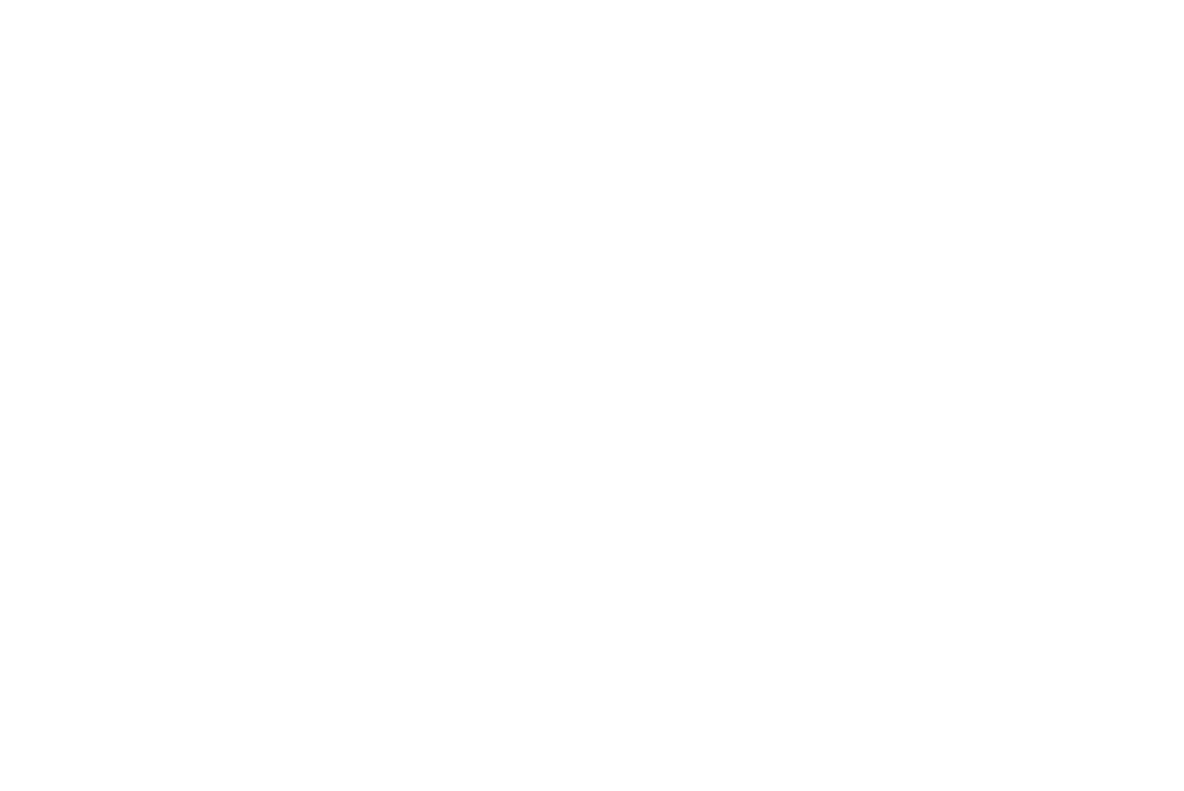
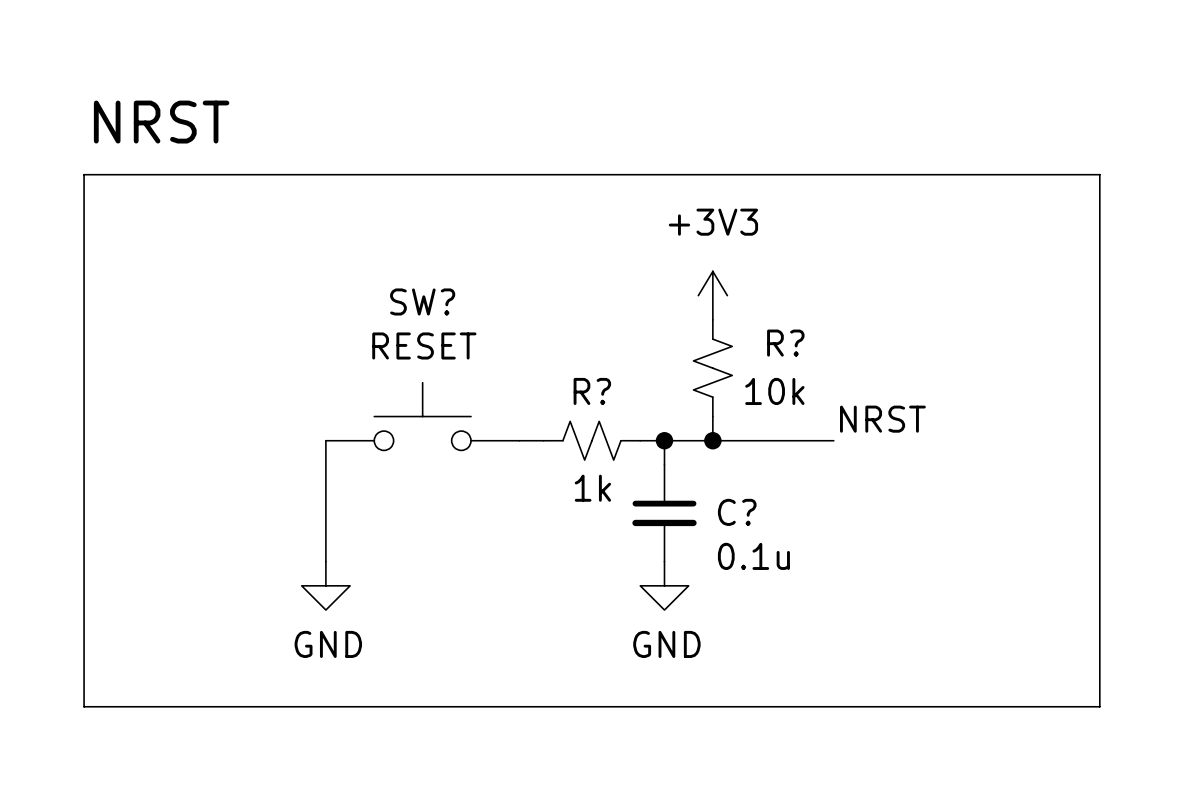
text: none -> NRST (161, 122)
line: none -> (84, 174) (84, 706) (1099, 706) (1099, 174) (84, 174)
power symbol: none -> +3V3 (712, 295)
R?: none -> 10k (712, 368)
SW?: none -> RESET (422, 416)
wire: none -> (712, 416) (712, 440)
label: none -> NRST (882, 419)
wire: none -> (325, 440) (325, 561)
wire: none -> (519, 440) (543, 440)
R?: none -> 1k (591, 440)
wire: none -> (640, 440) (833, 440)
wire: none -> (664, 440) (664, 464)
junction: none -> (664, 440)
junction: none -> (712, 440)
C?: none -> 0.1u (664, 513)
power symbol: none -> GND (325, 585)
power symbol: none -> GND (664, 585)

